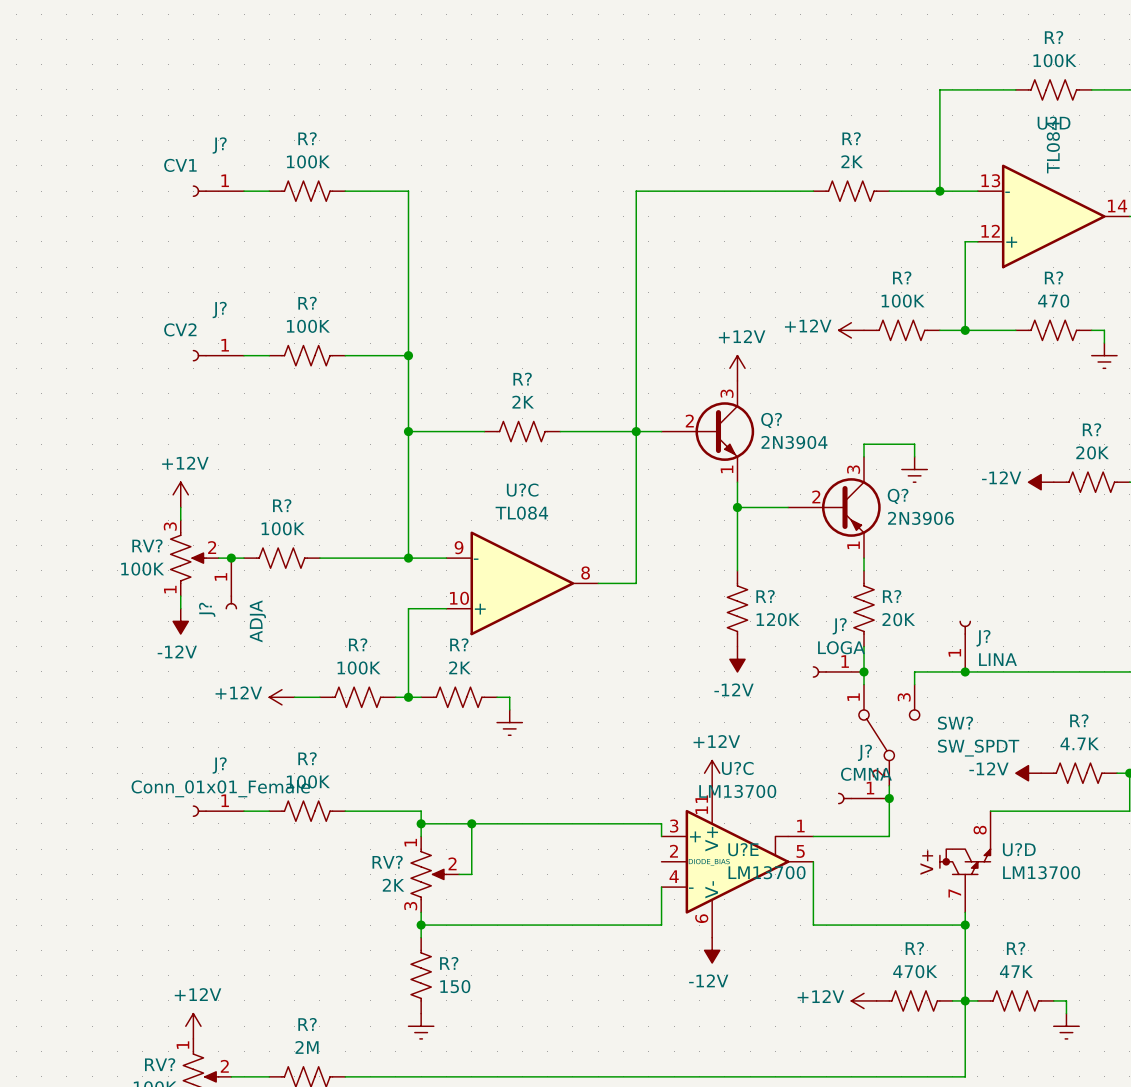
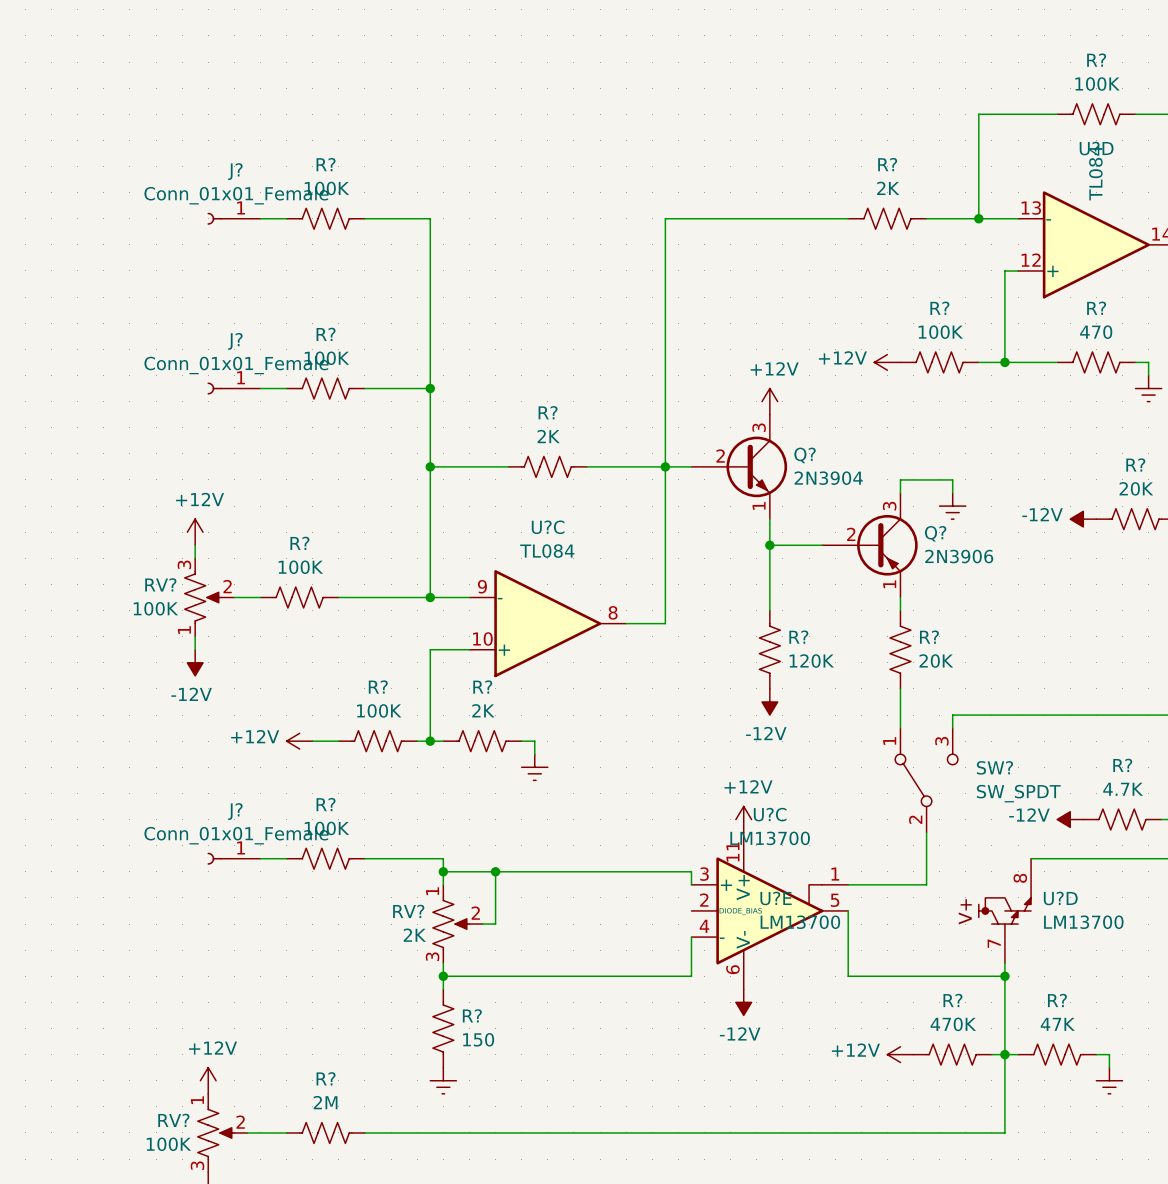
J? value: CV1 (180, 165) -> Conn_01x01_Female (236, 195)
J? value: CV2 (180, 329) -> Conn_01x01_Female (236, 365)
junction: (231, 558) -> none
J?: ADJA (231, 583) -> none
J?: LINA (965, 646) -> none
J?: LOGA (838, 671) -> none
junction: (864, 671) -> none
junction: (965, 671) -> none
J?: CMNA (863, 798) -> none
junction: (889, 798) -> none

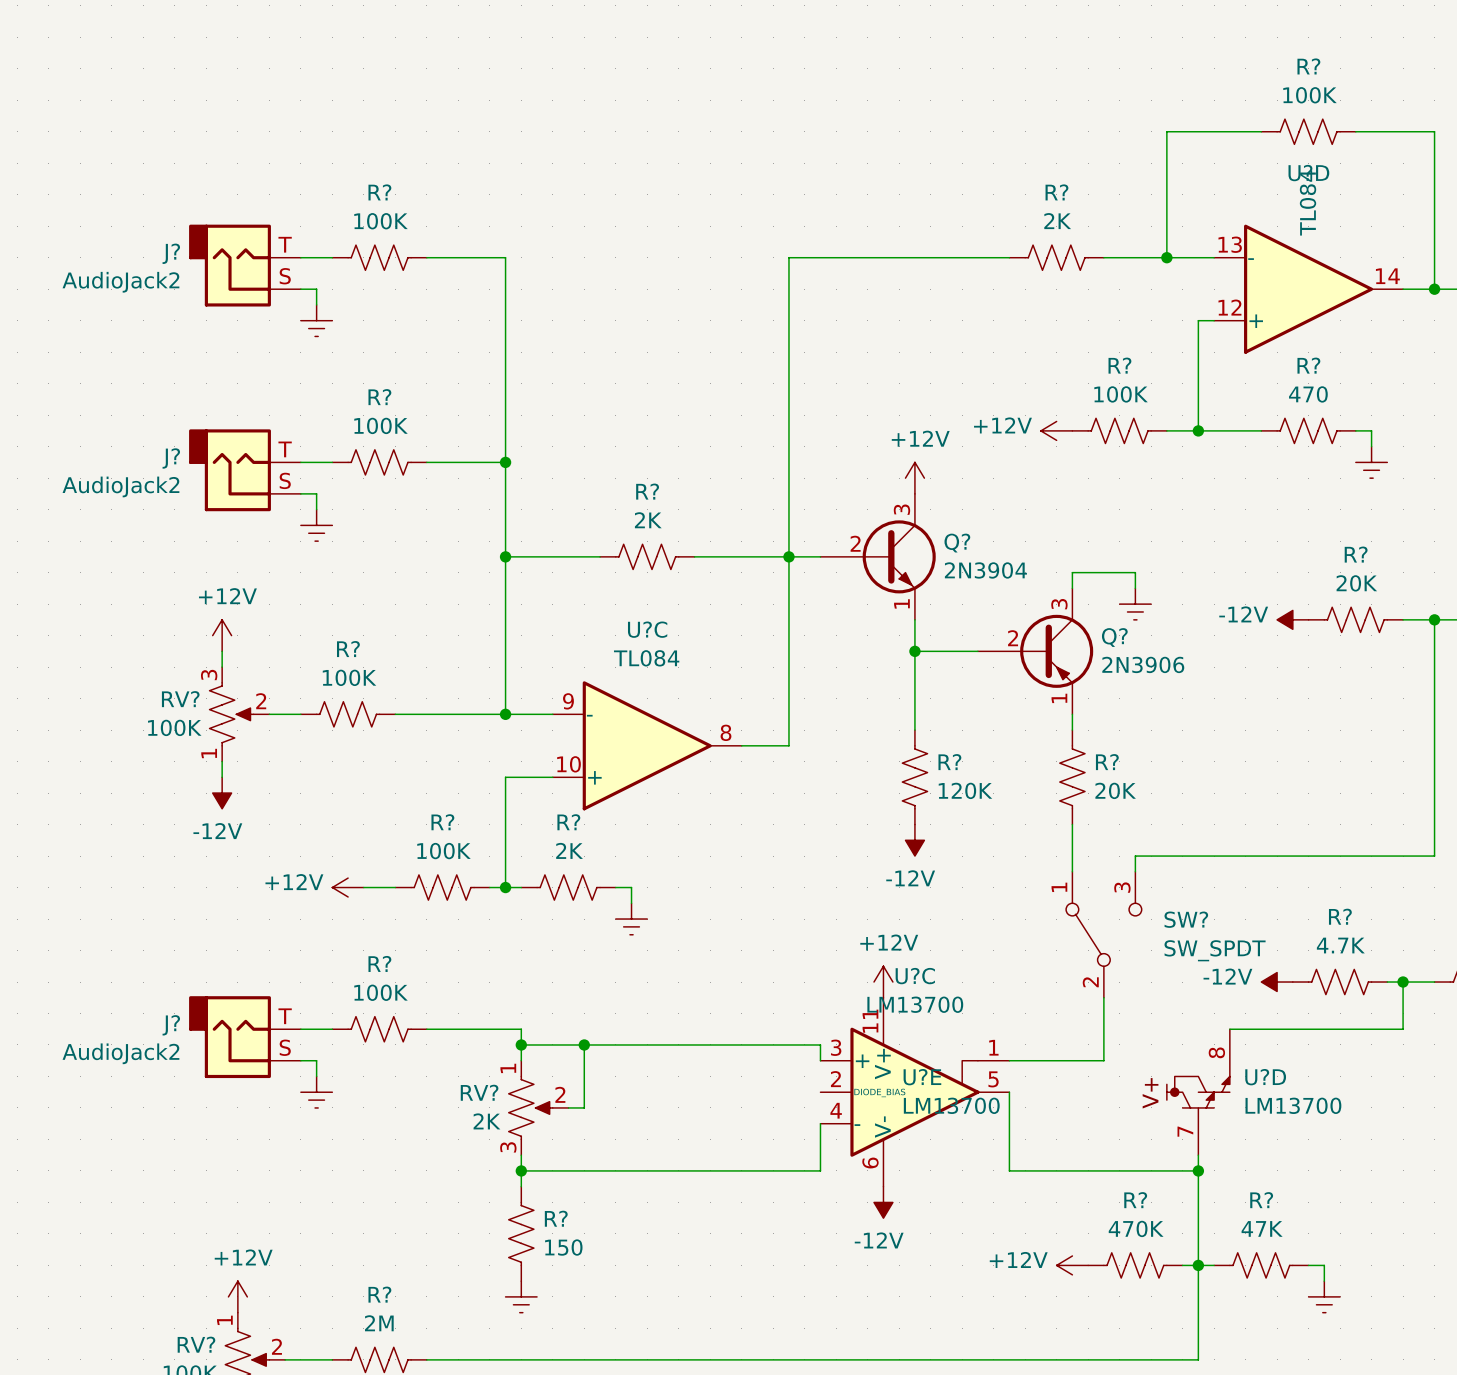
J?: Conn_01x01_Female (233, 218) -> none
J?: none -> AudioJack2 (244, 265)
wire: none -> (300, 289) (316, 289) (316, 304)
power symbol: none -> (316, 320)
J?: Conn_01x01_Female (233, 388) -> none
J?: none -> AudioJack2 (244, 470)
wire: none -> (300, 493) (316, 493) (316, 509)
power symbol: none -> (316, 525)
J?: Conn_01x01_Female (233, 858) -> none
J?: none -> AudioJack2 (244, 1037)
wire: none -> (300, 1060) (316, 1060) (316, 1076)
power symbol: none -> (316, 1092)

